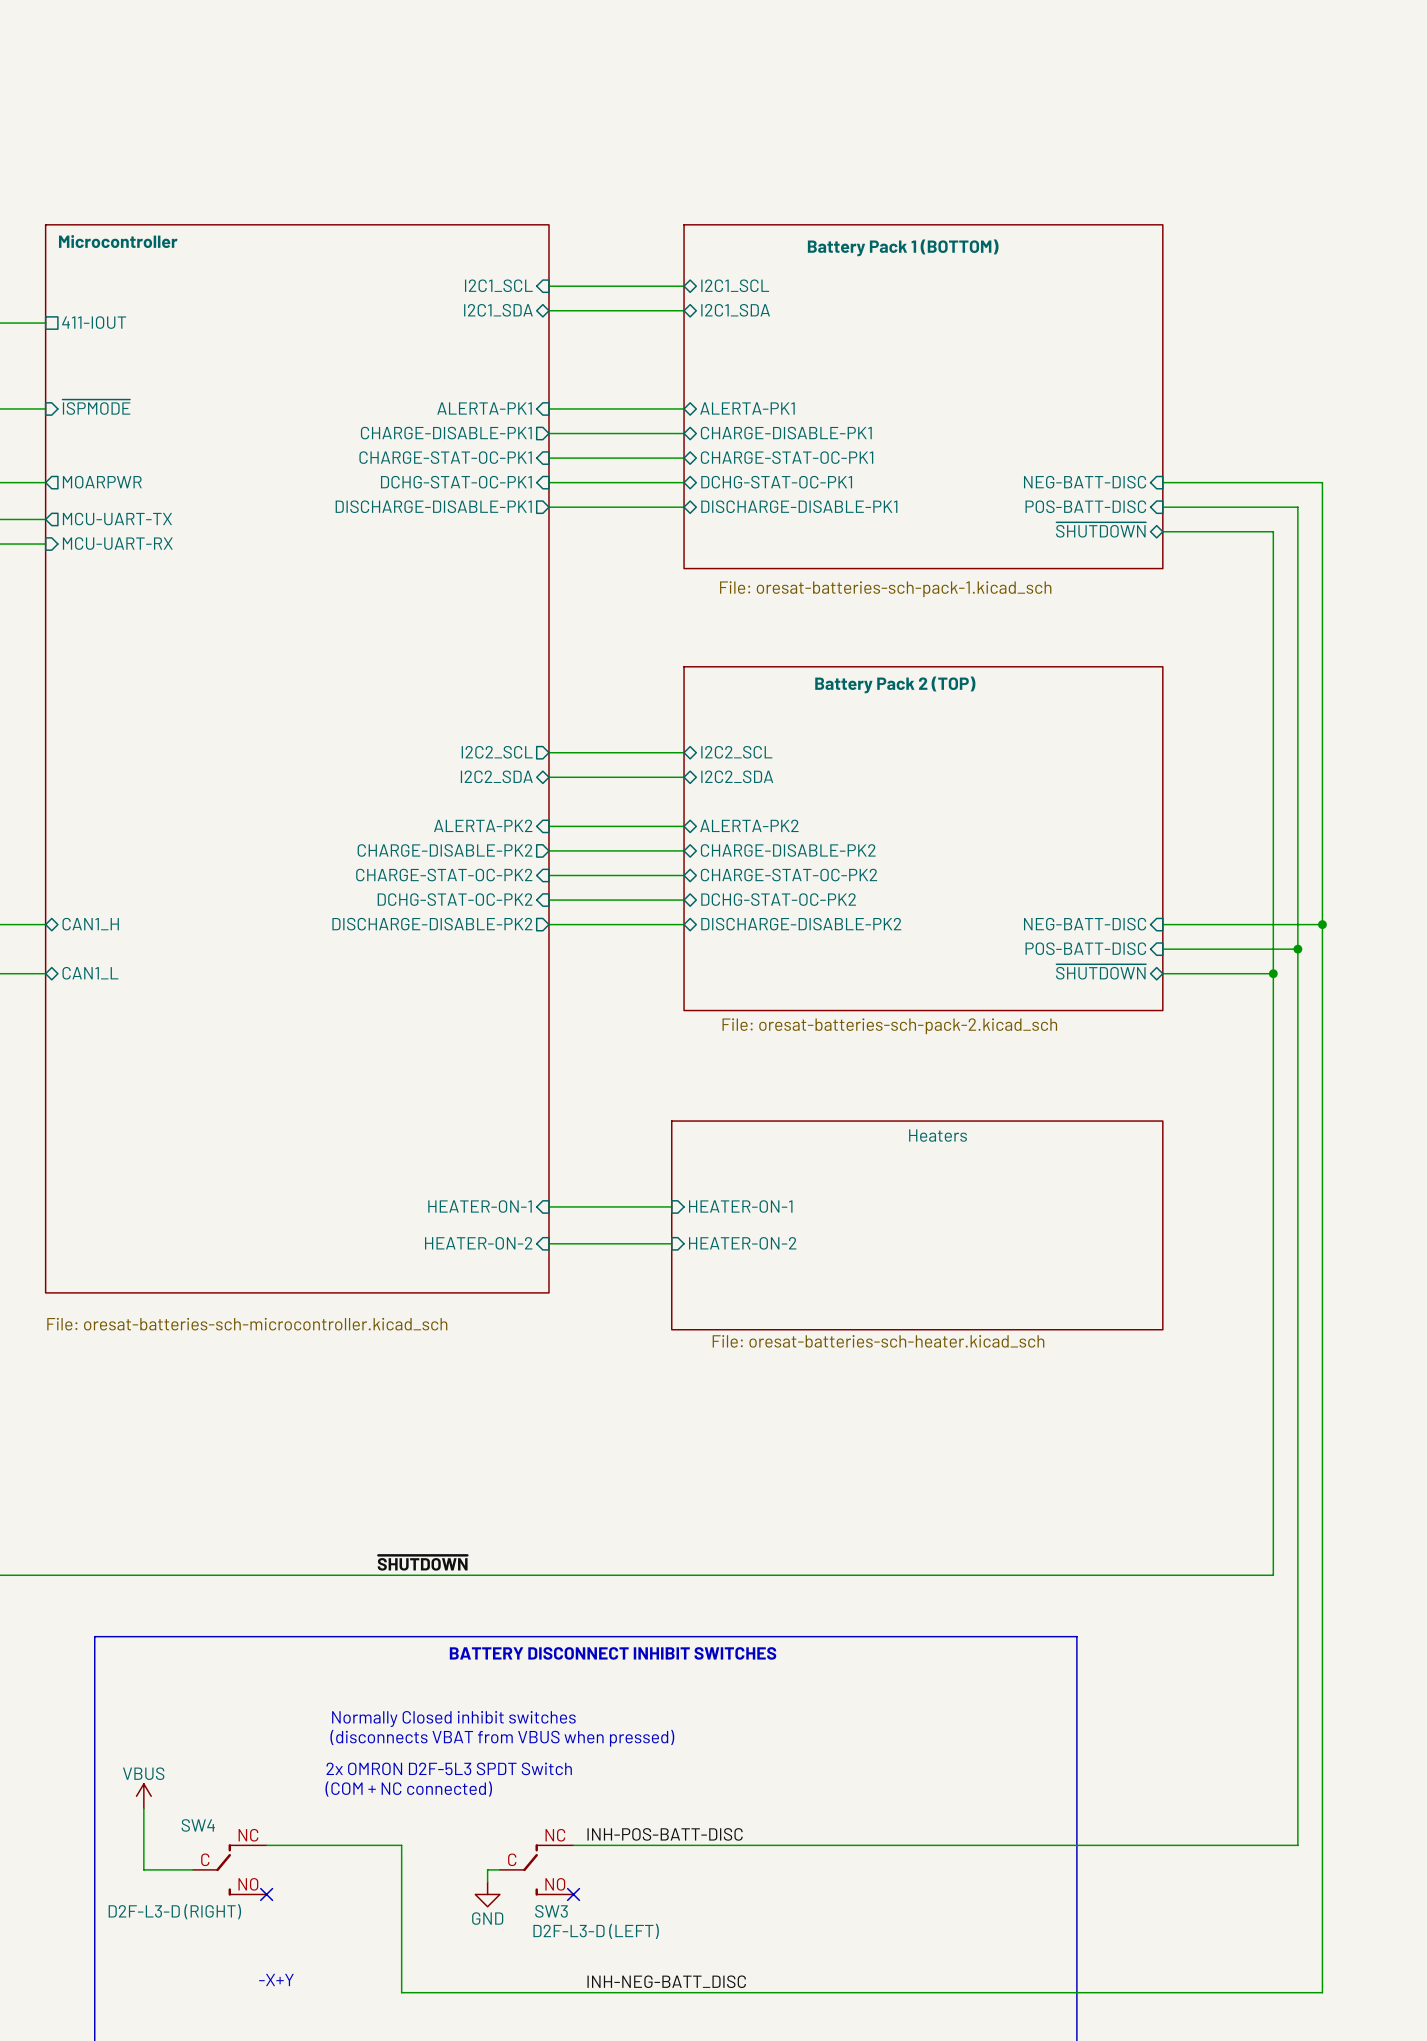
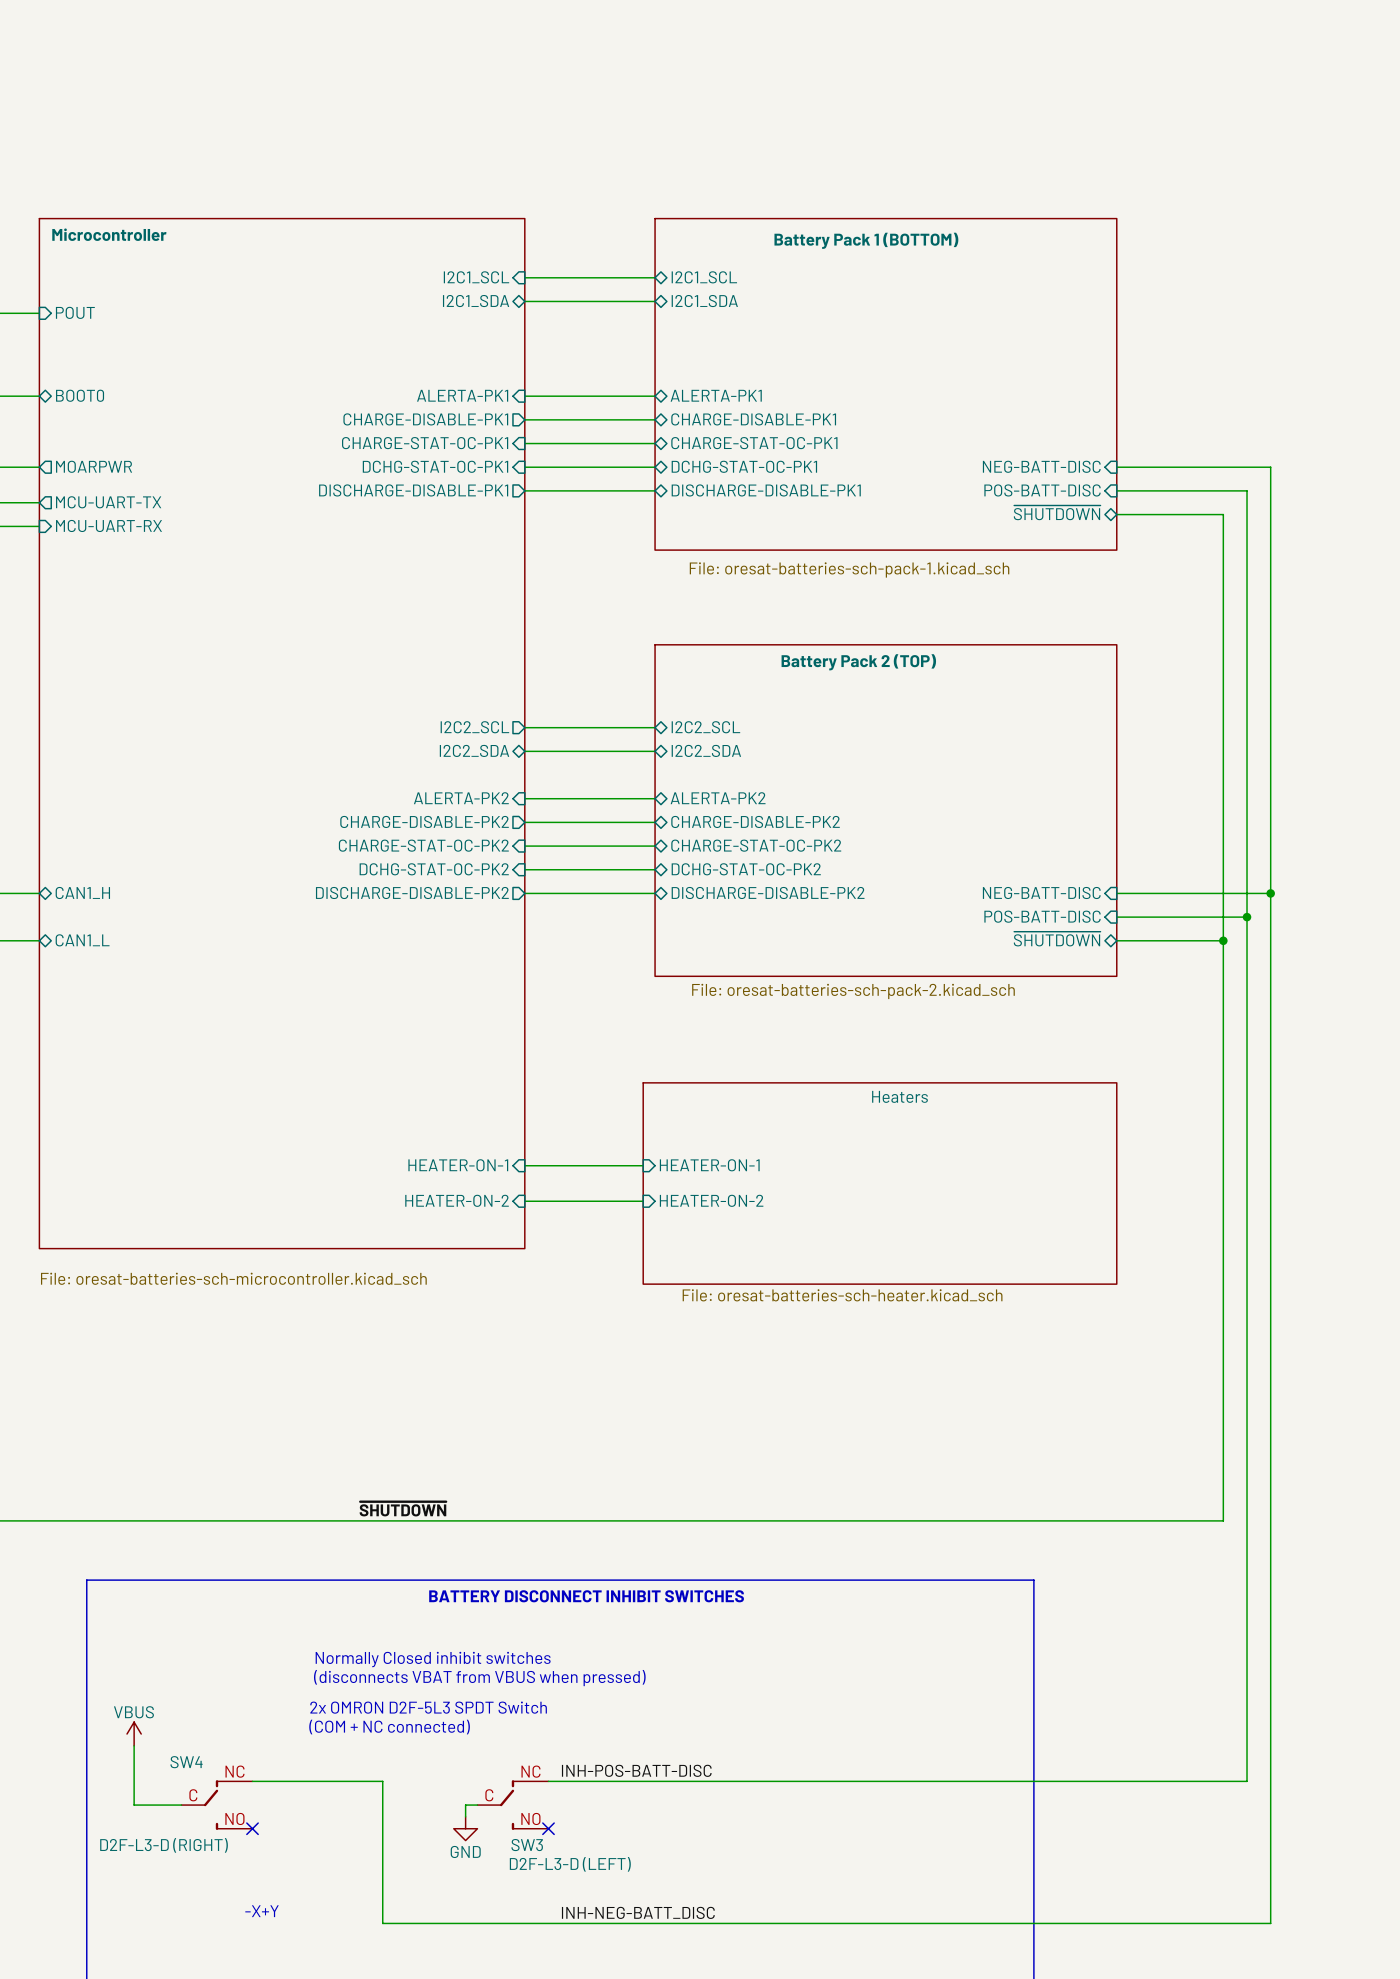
sheet pin shape: passive (94, 322) -> input (75, 312)
sheet pin: 411-IOUT (94, 322) -> POUT (75, 312)
sheet pin shape: input (96, 407) -> bidirectional (80, 395)
sheet pin: ~{ISPMODE} (96, 407) -> BOOT0 (80, 395)

